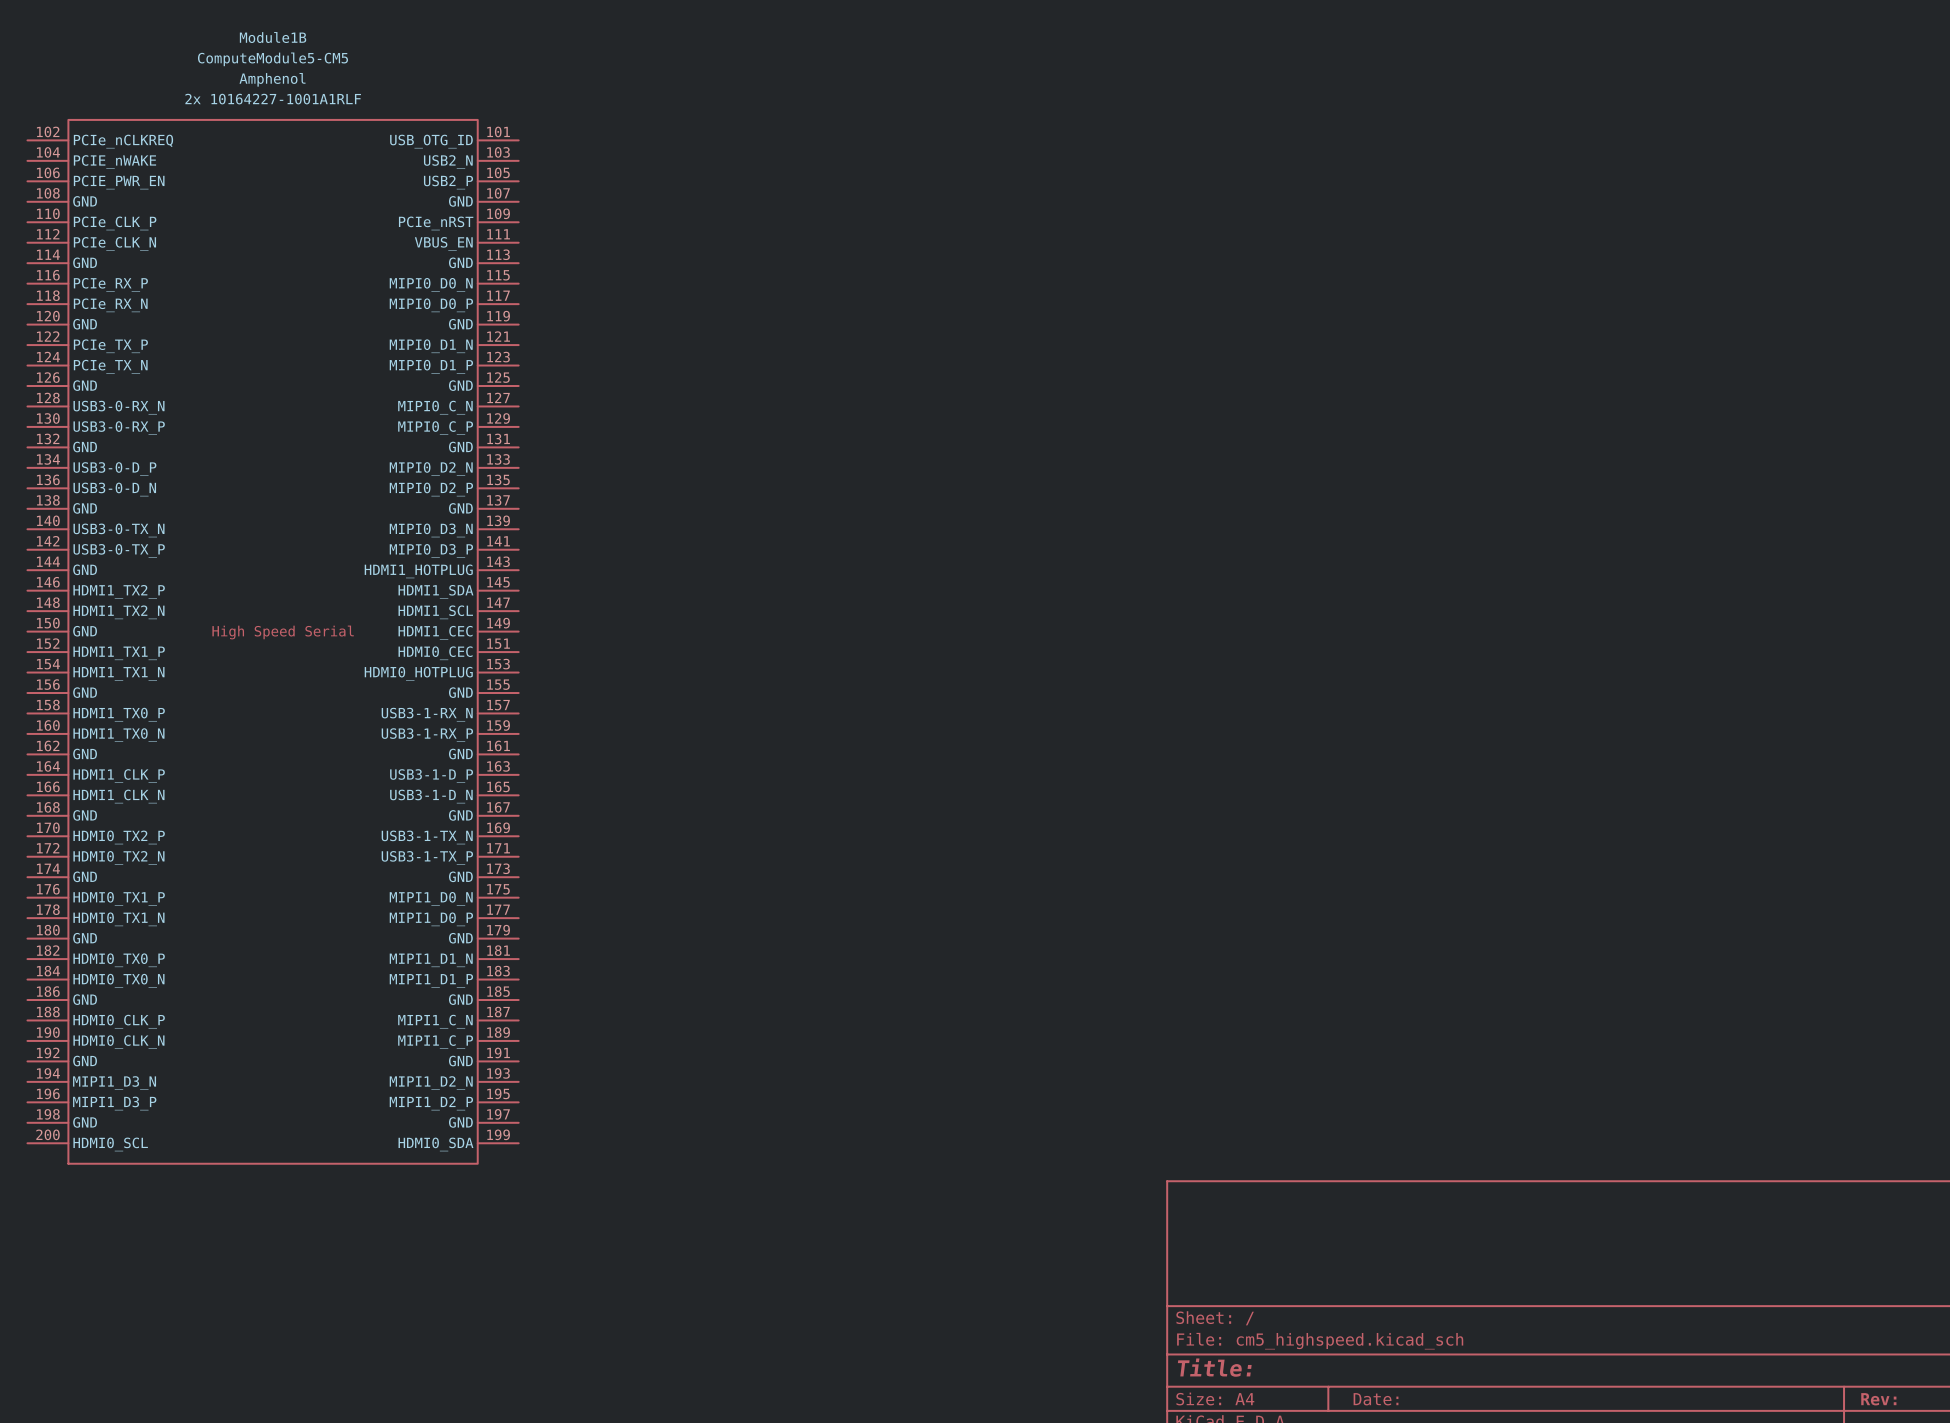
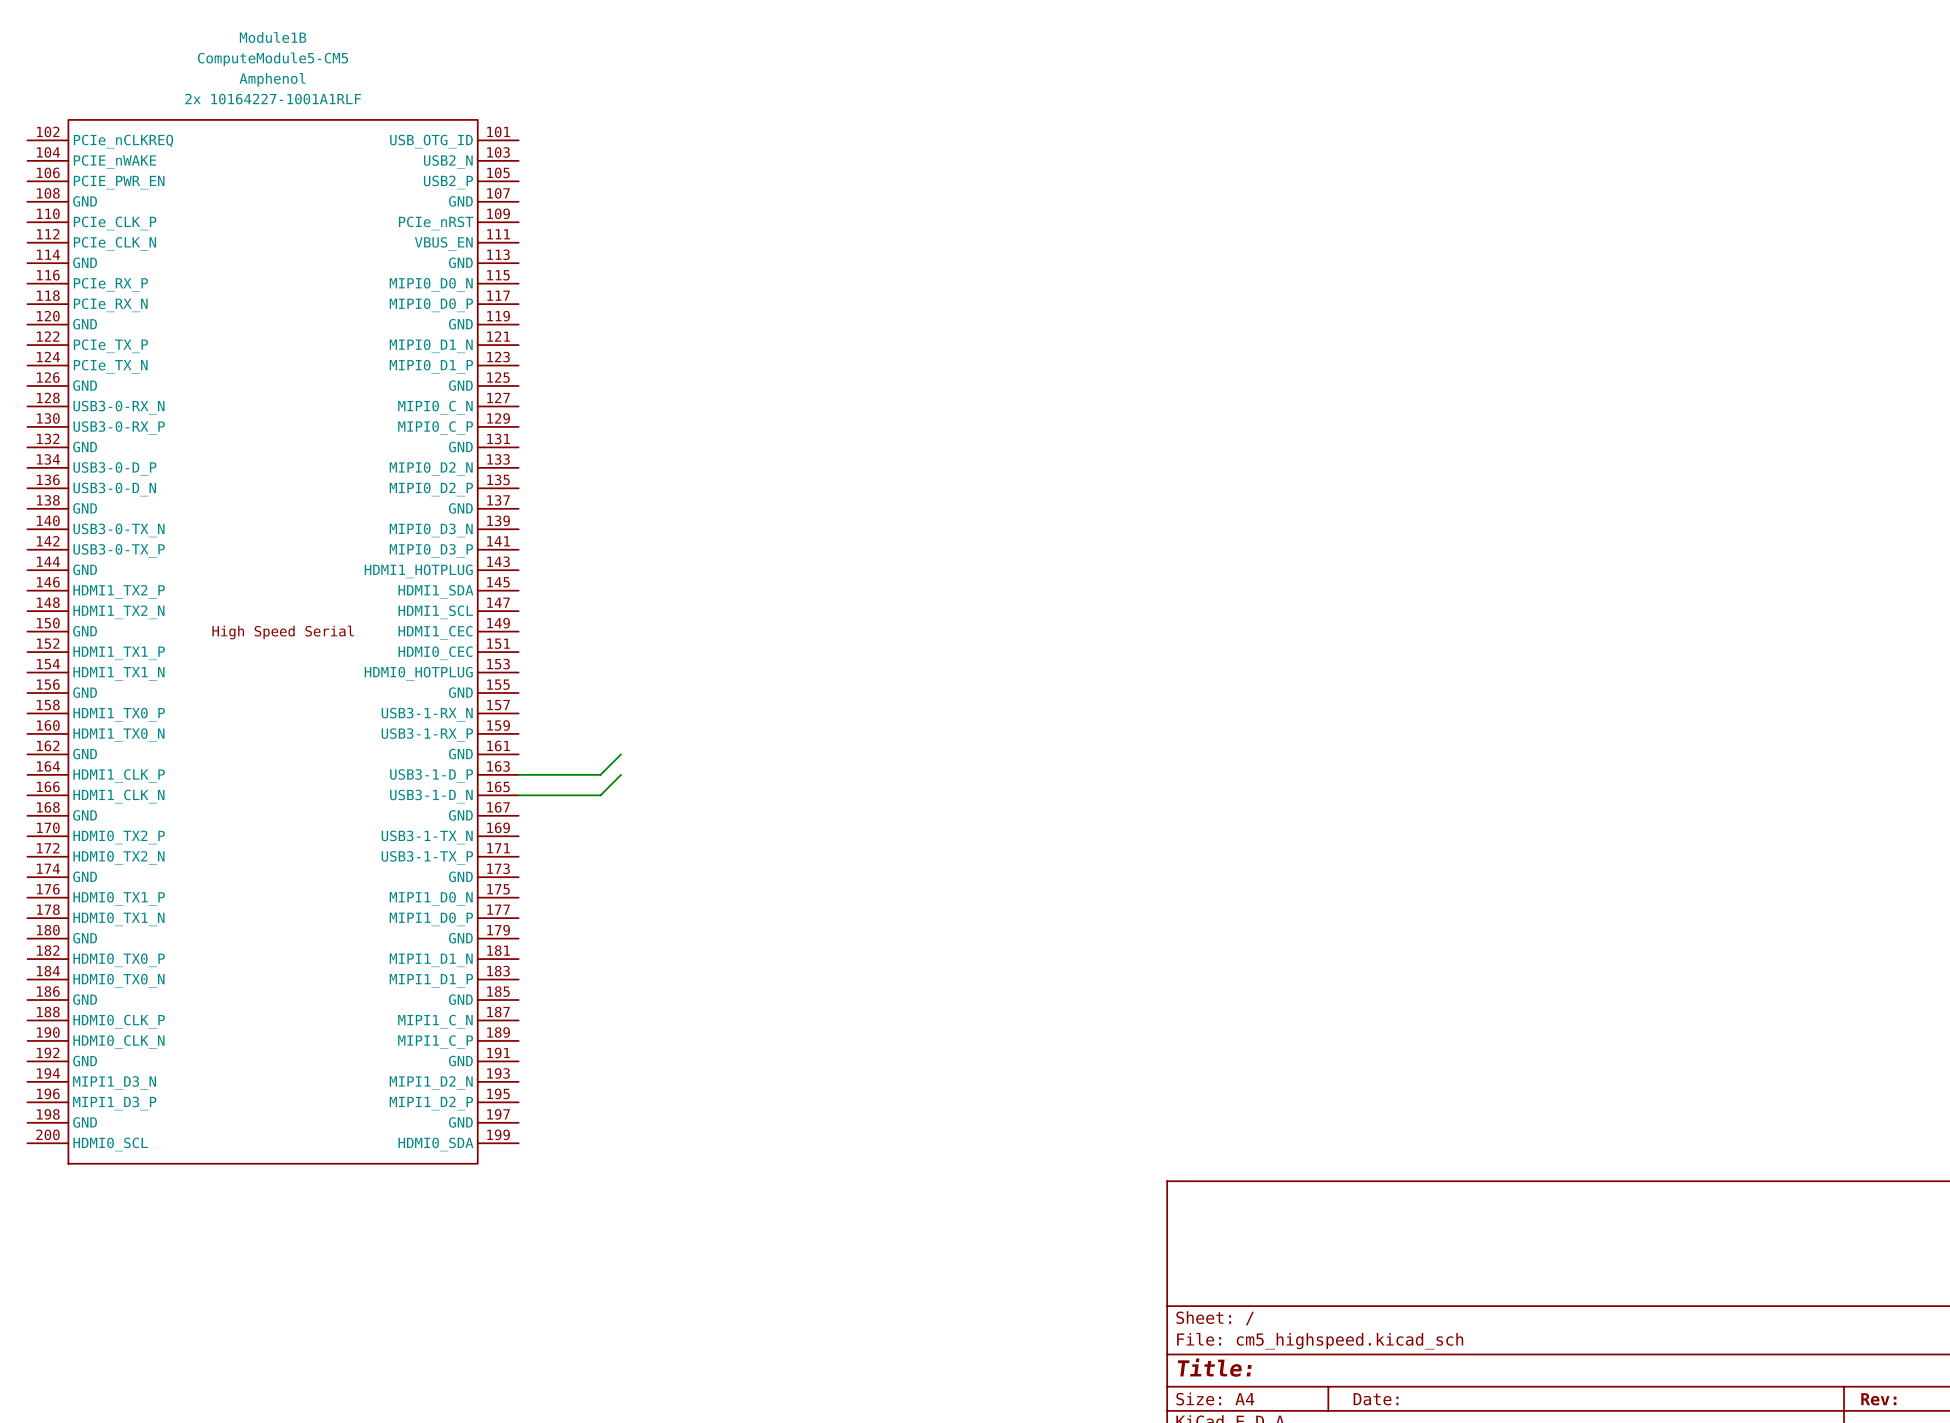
wire: none -> (621, 754) (600, 774) (518, 774)
wire: none -> (621, 774) (600, 795) (518, 795)

